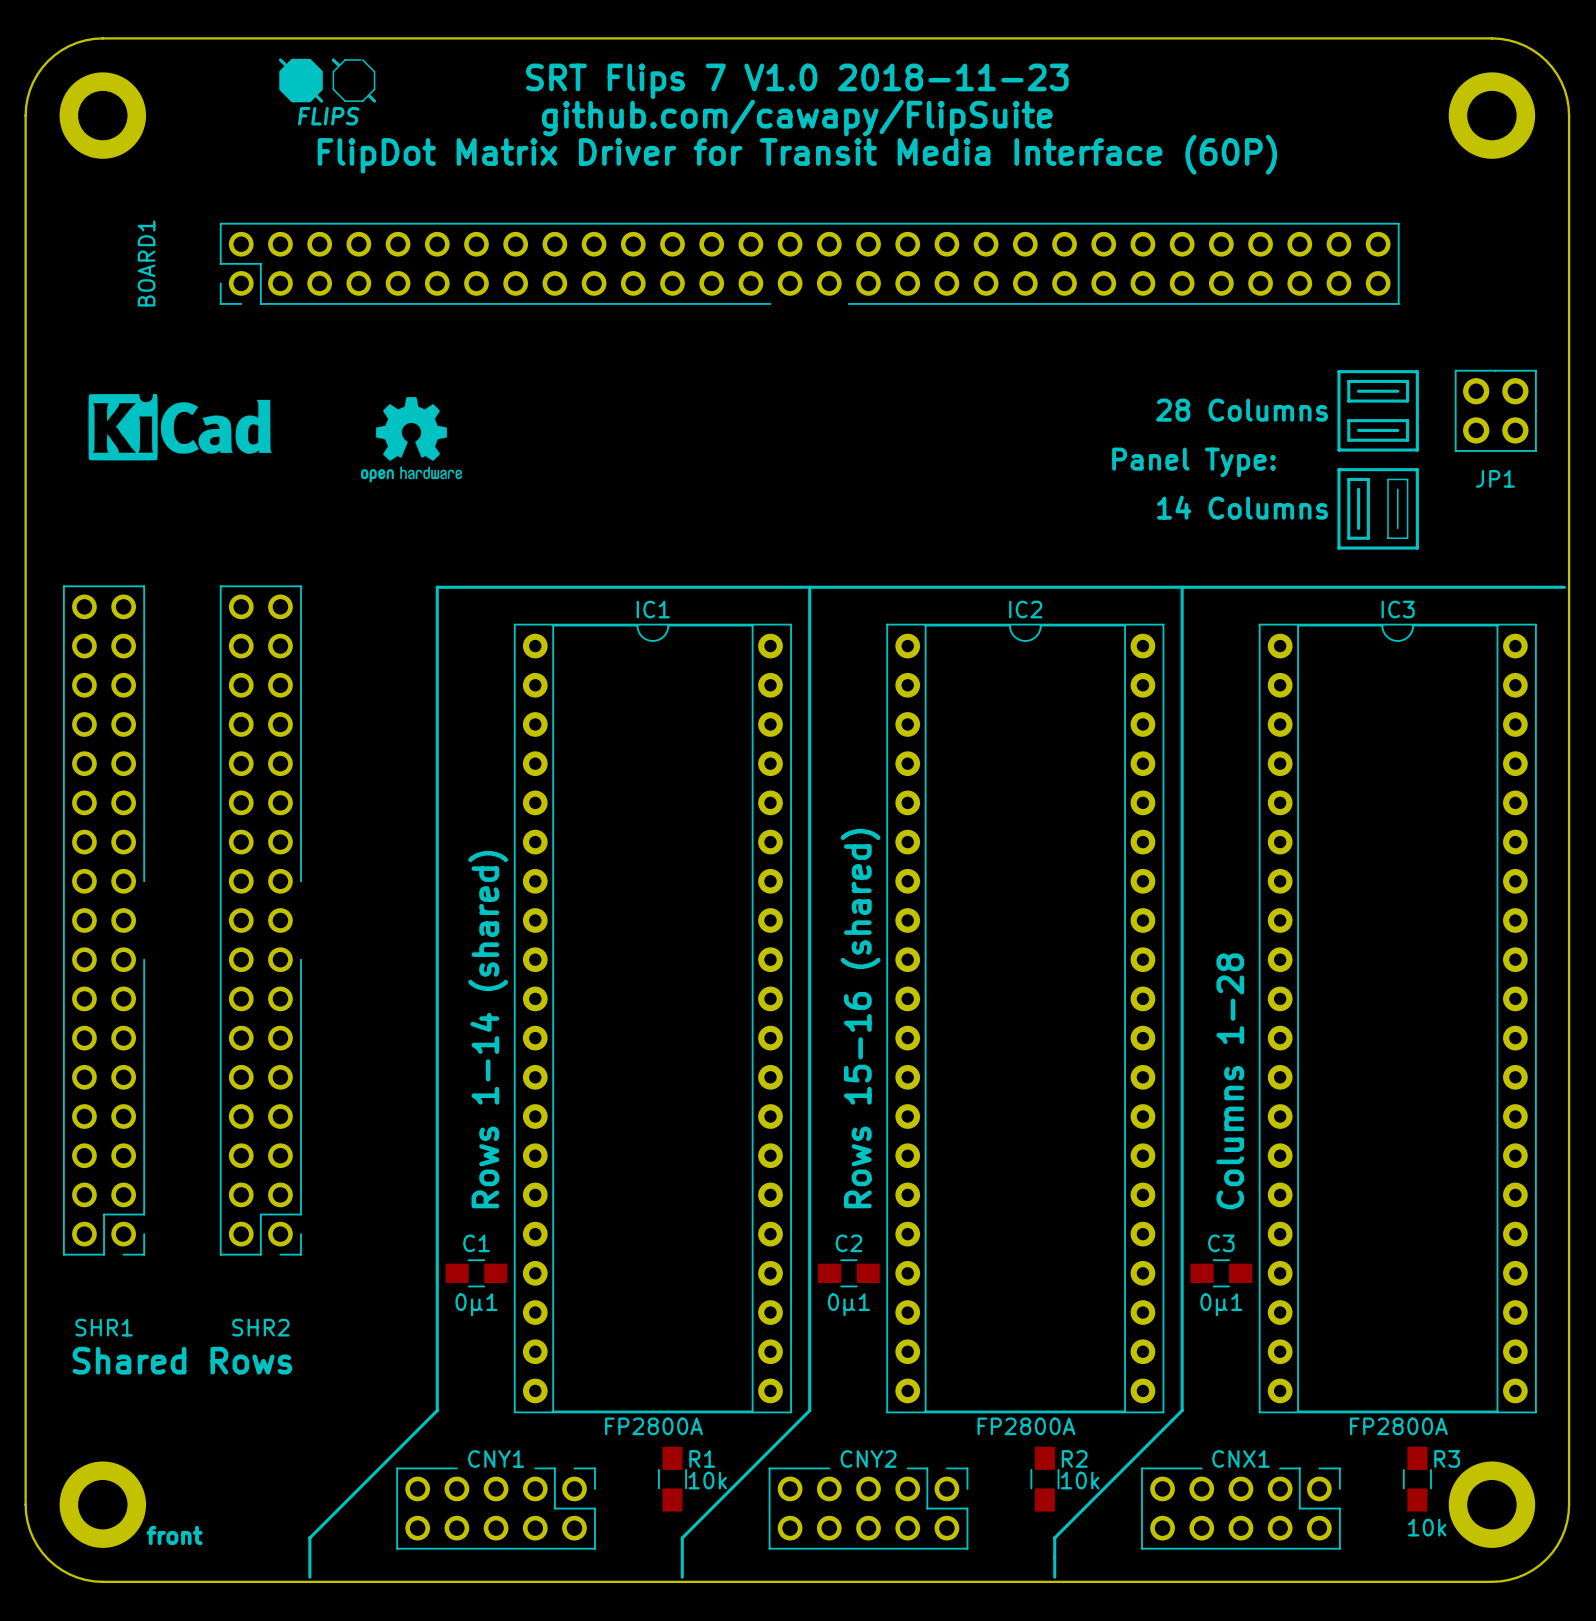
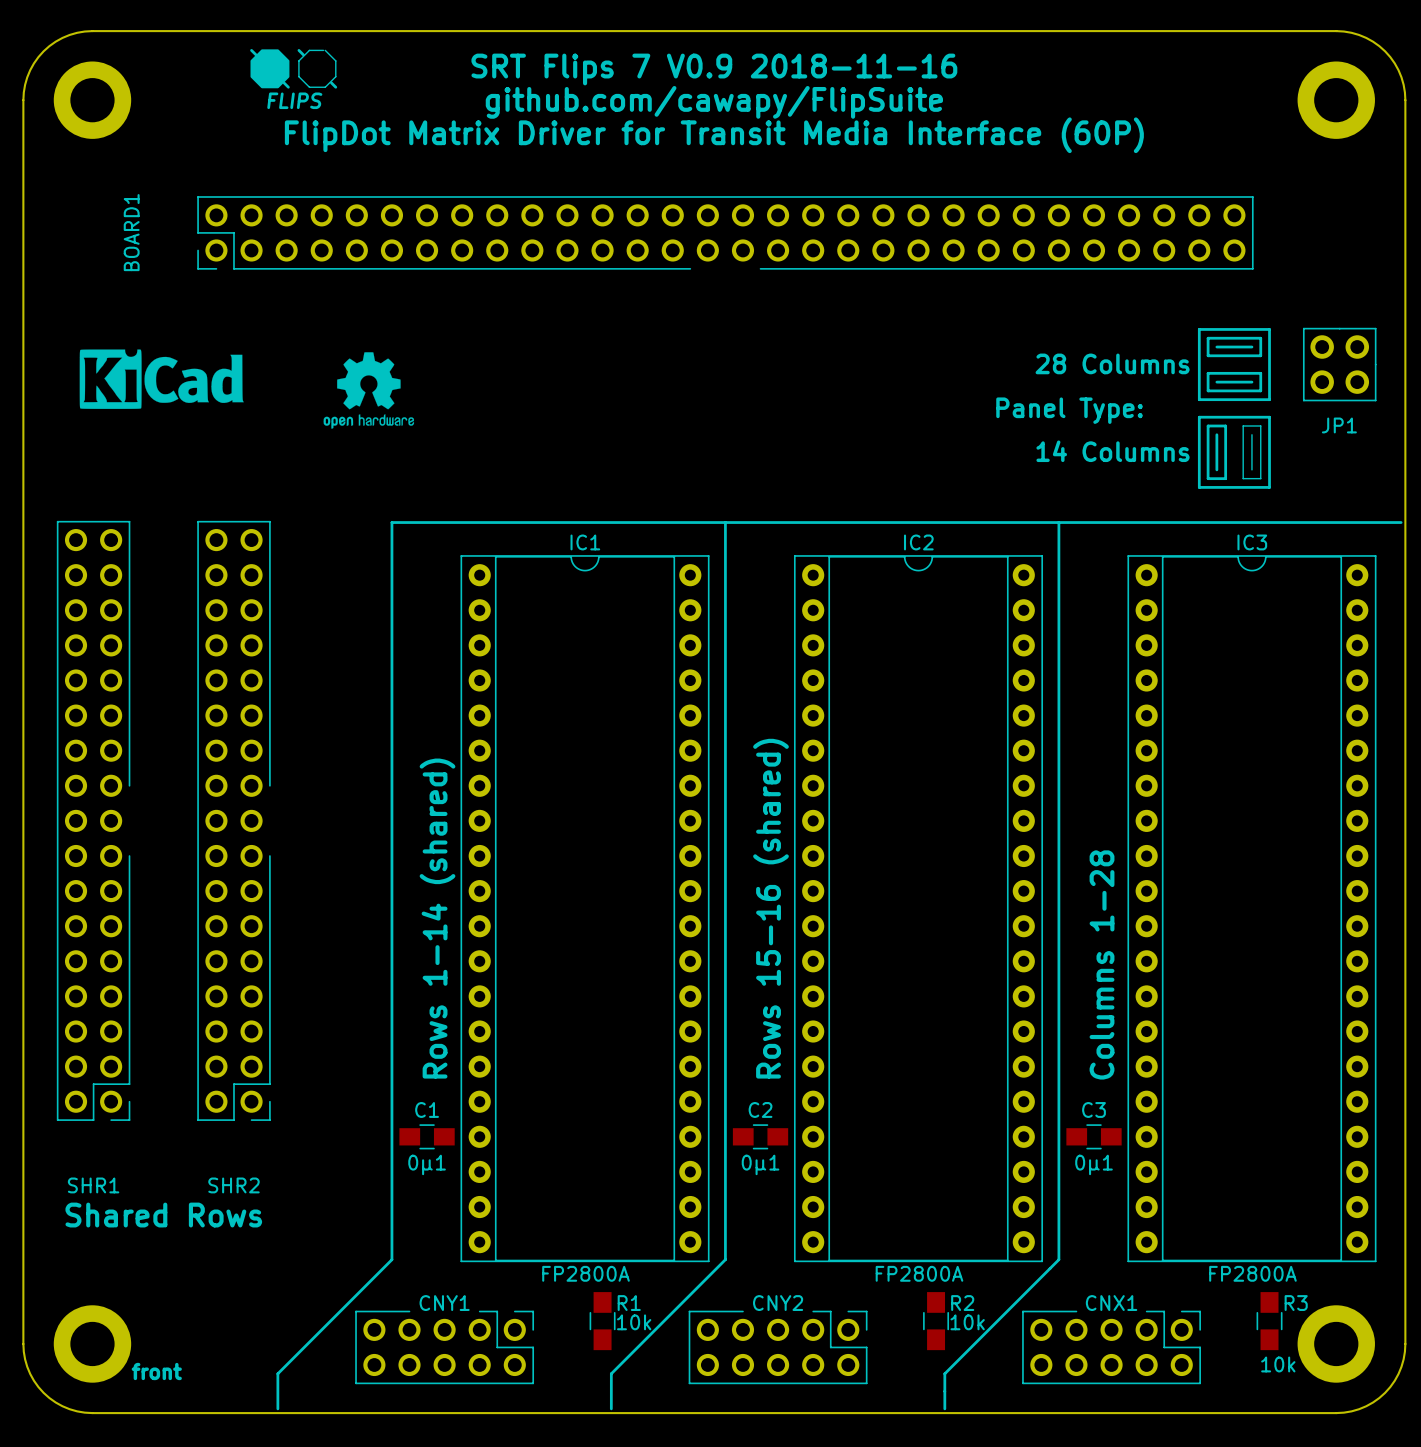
text: SRT Flips 7 V1.0 2018-11-23 (797, 81) -> SRT Flips 7 V0.9 2018-11-16 (714, 69)

